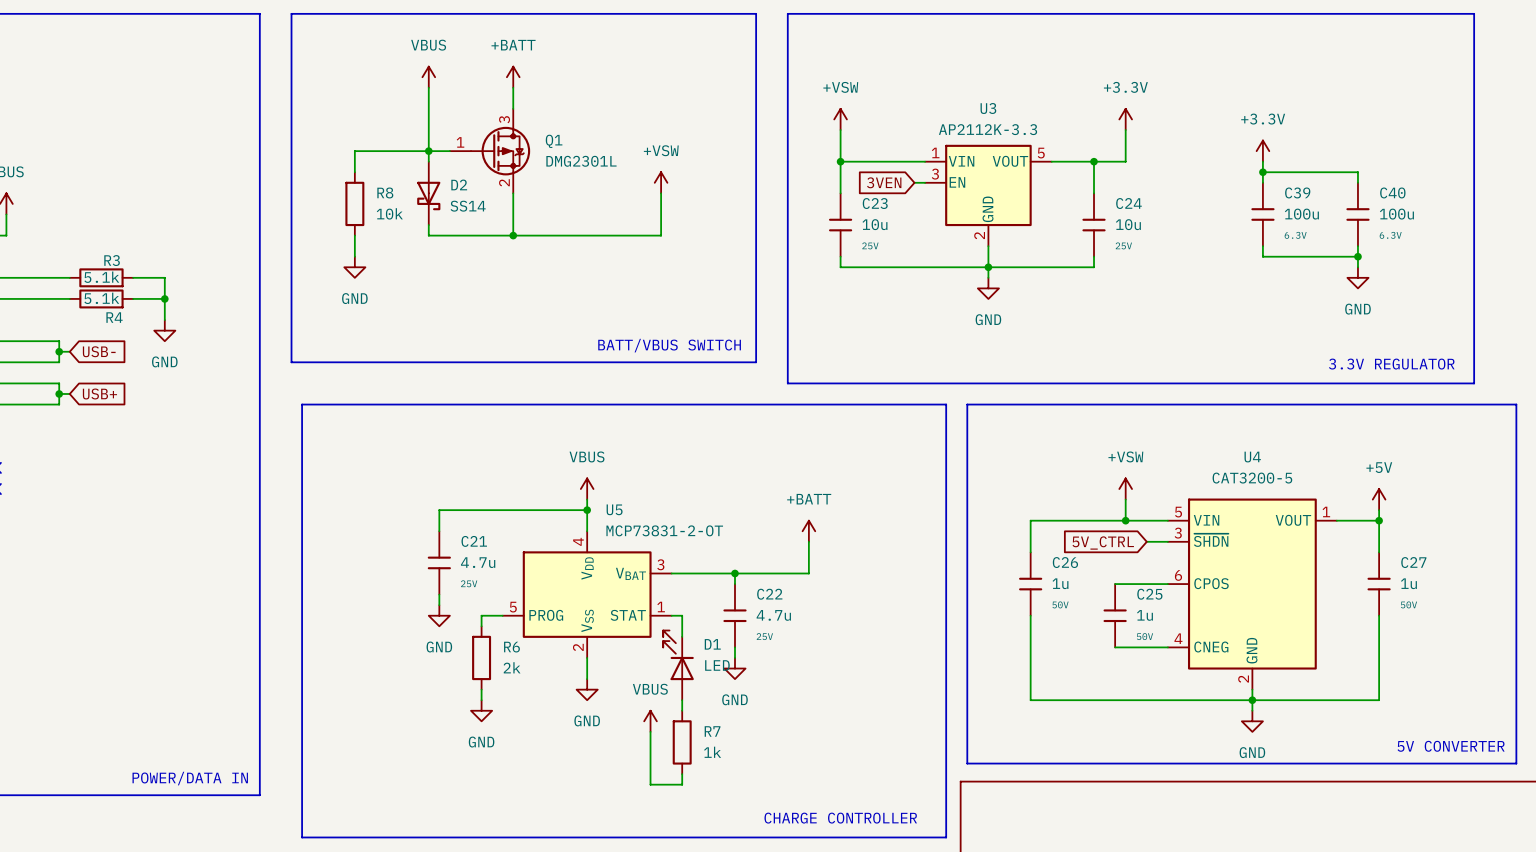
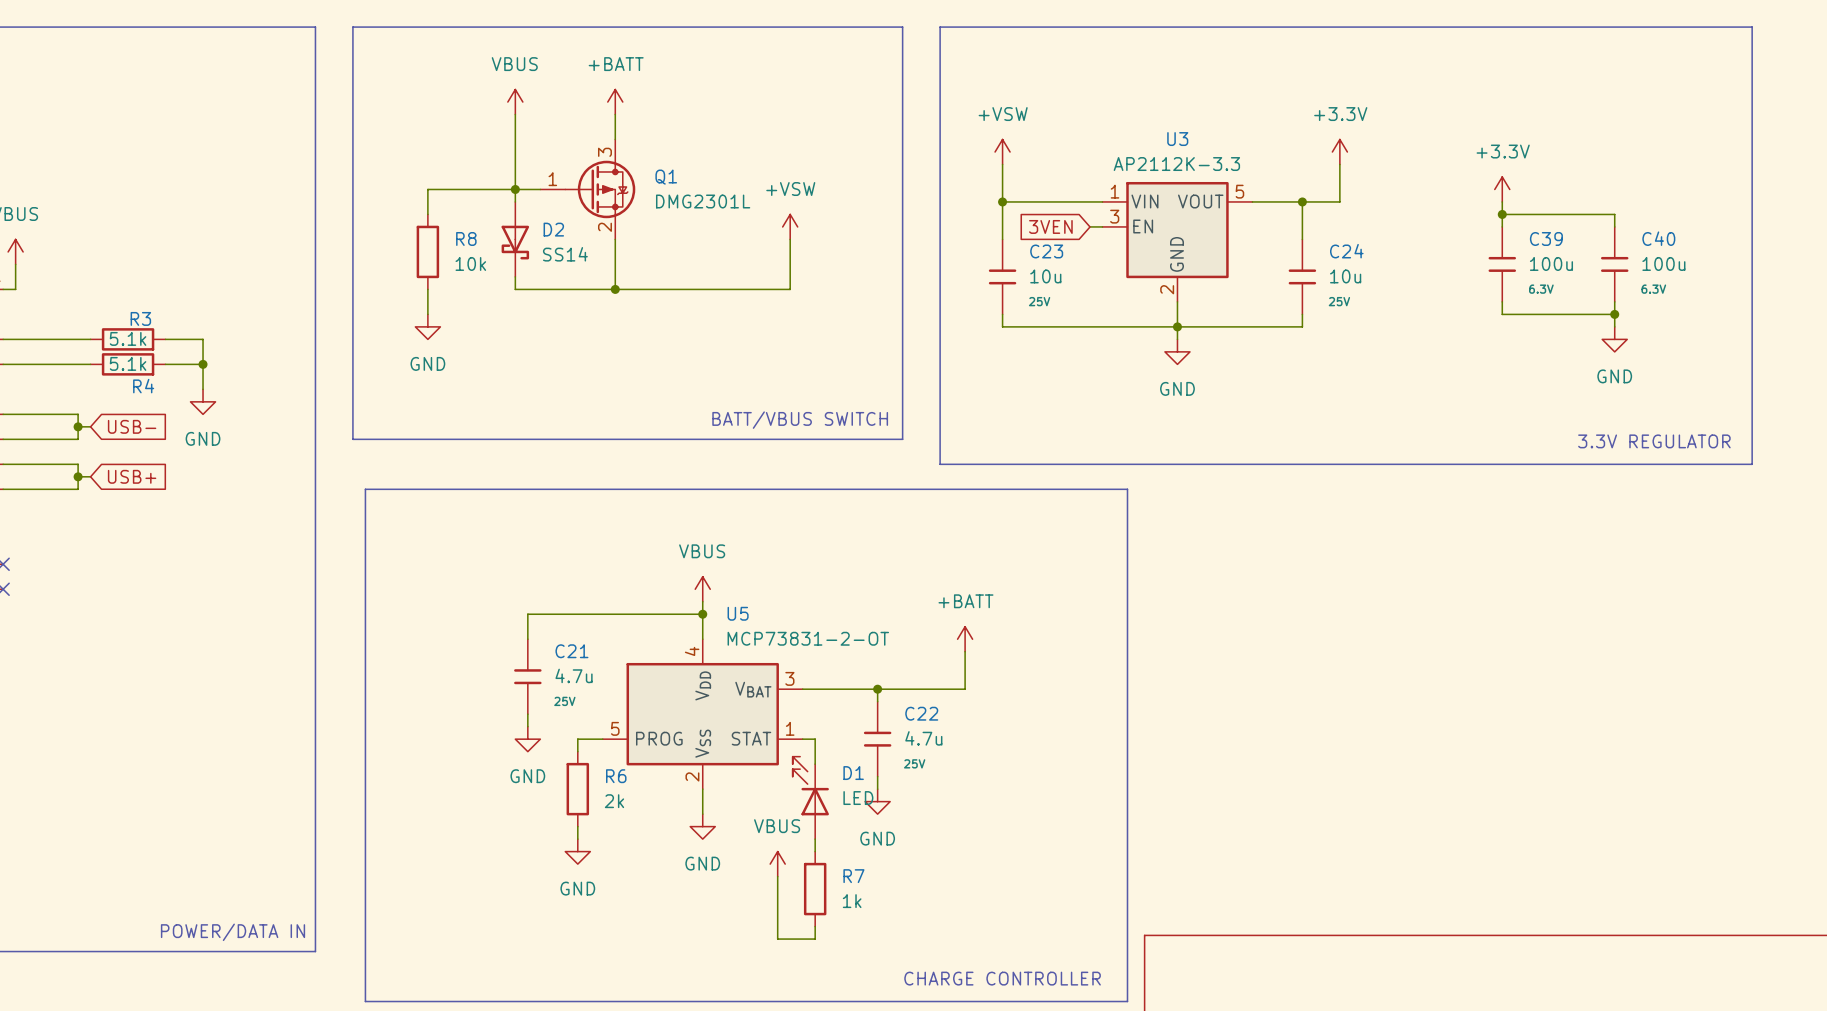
line: (967, 404) (1516, 404) (1516, 763) (967, 763) (967, 404) -> none
power symbol: +VSW (1125, 489) -> none
wire: (1125, 499) (1125, 520) -> none
power symbol: +5V (1379, 499) -> none
wire: (1379, 510) (1379, 552) -> none
junction: (1125, 520) -> none
wire: (1167, 520) (1030, 520) (1030, 552) -> none
wire: (1336, 520) (1379, 520) -> none
junction: (1379, 520) -> none
wire: (1146, 541) (1167, 541) -> none
global label: 5V_CTRL (1103, 543) -> none
C26: 1u (1030, 584) -> none
wire: (1115, 584) (1167, 584) -> none
C27: 1u (1379, 584) -> none
U4: CAT3200-5 (1252, 594) -> none
wire: (1030, 615) (1030, 700) (1379, 700) (1379, 615) -> none
C25: 1u (1115, 615) -> none
wire: (1115, 647) (1167, 647) -> none
wire: (1252, 689) (1252, 710) -> none
junction: (1252, 700) -> none
power symbol: GND (1252, 721) -> none
text: 5V CONVERTER (1451, 746) -> none

